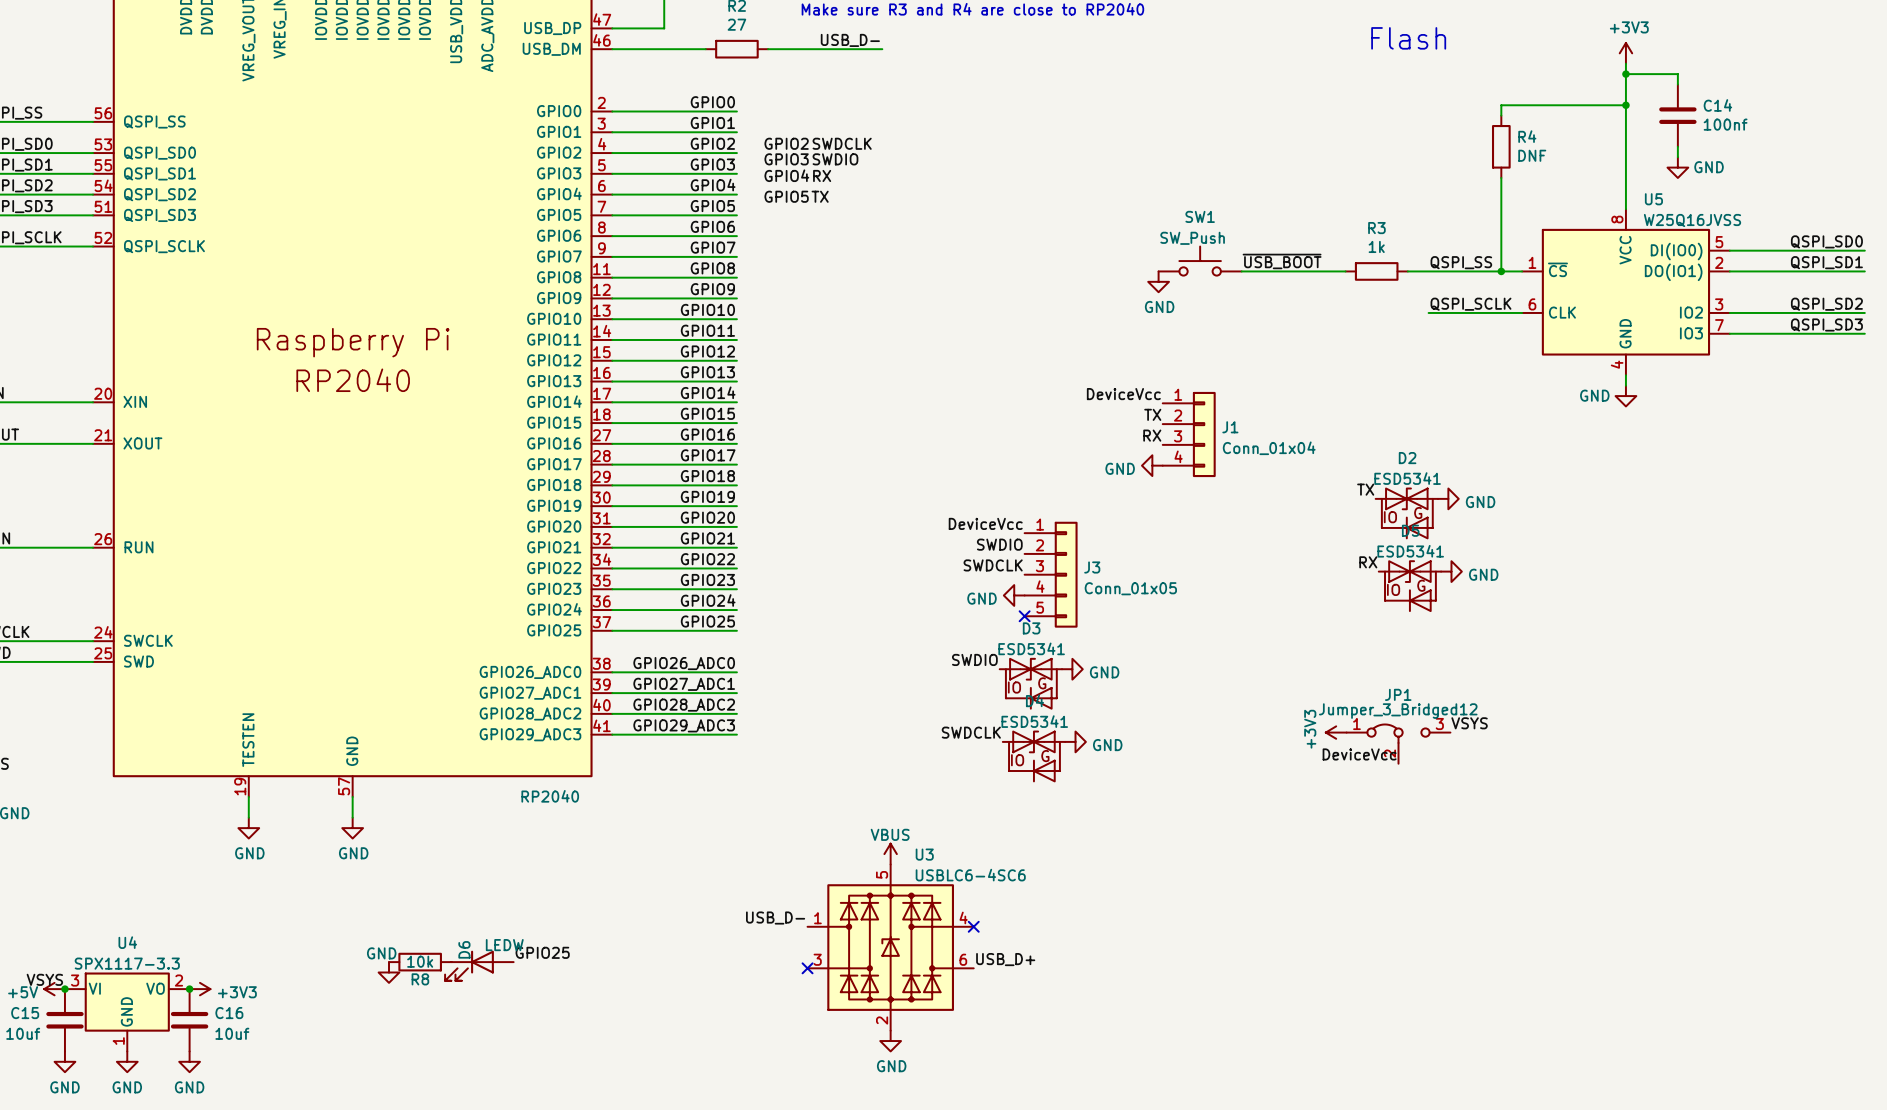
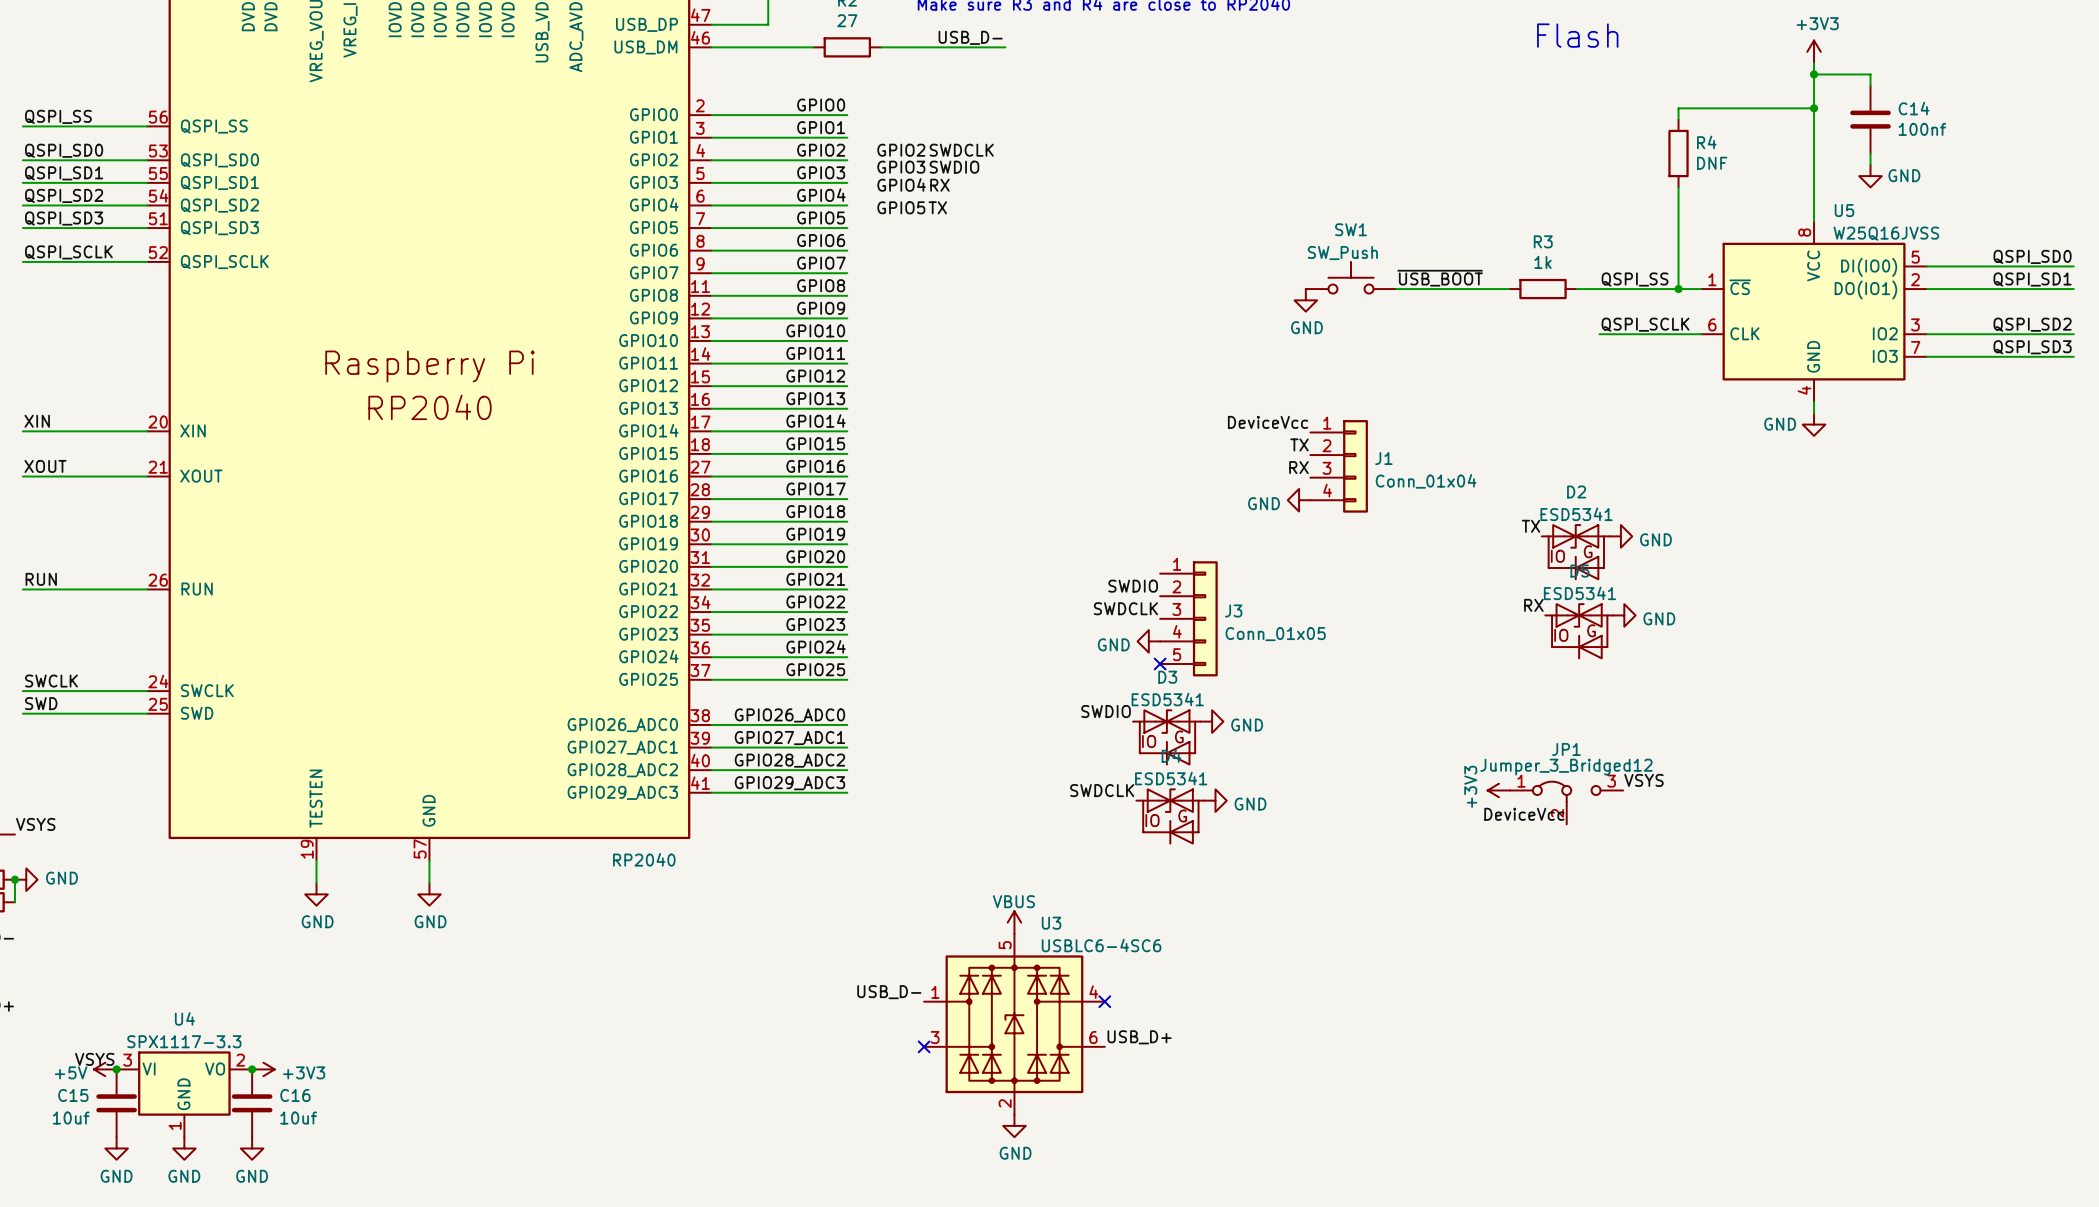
label: DeviceVcc (985, 523) -> none
label: GPIO25 (542, 952) -> none
R8: 10k (420, 962) -> none
D6: LEDW (479, 965) -> none
power symbol: GND (389, 972) -> none

